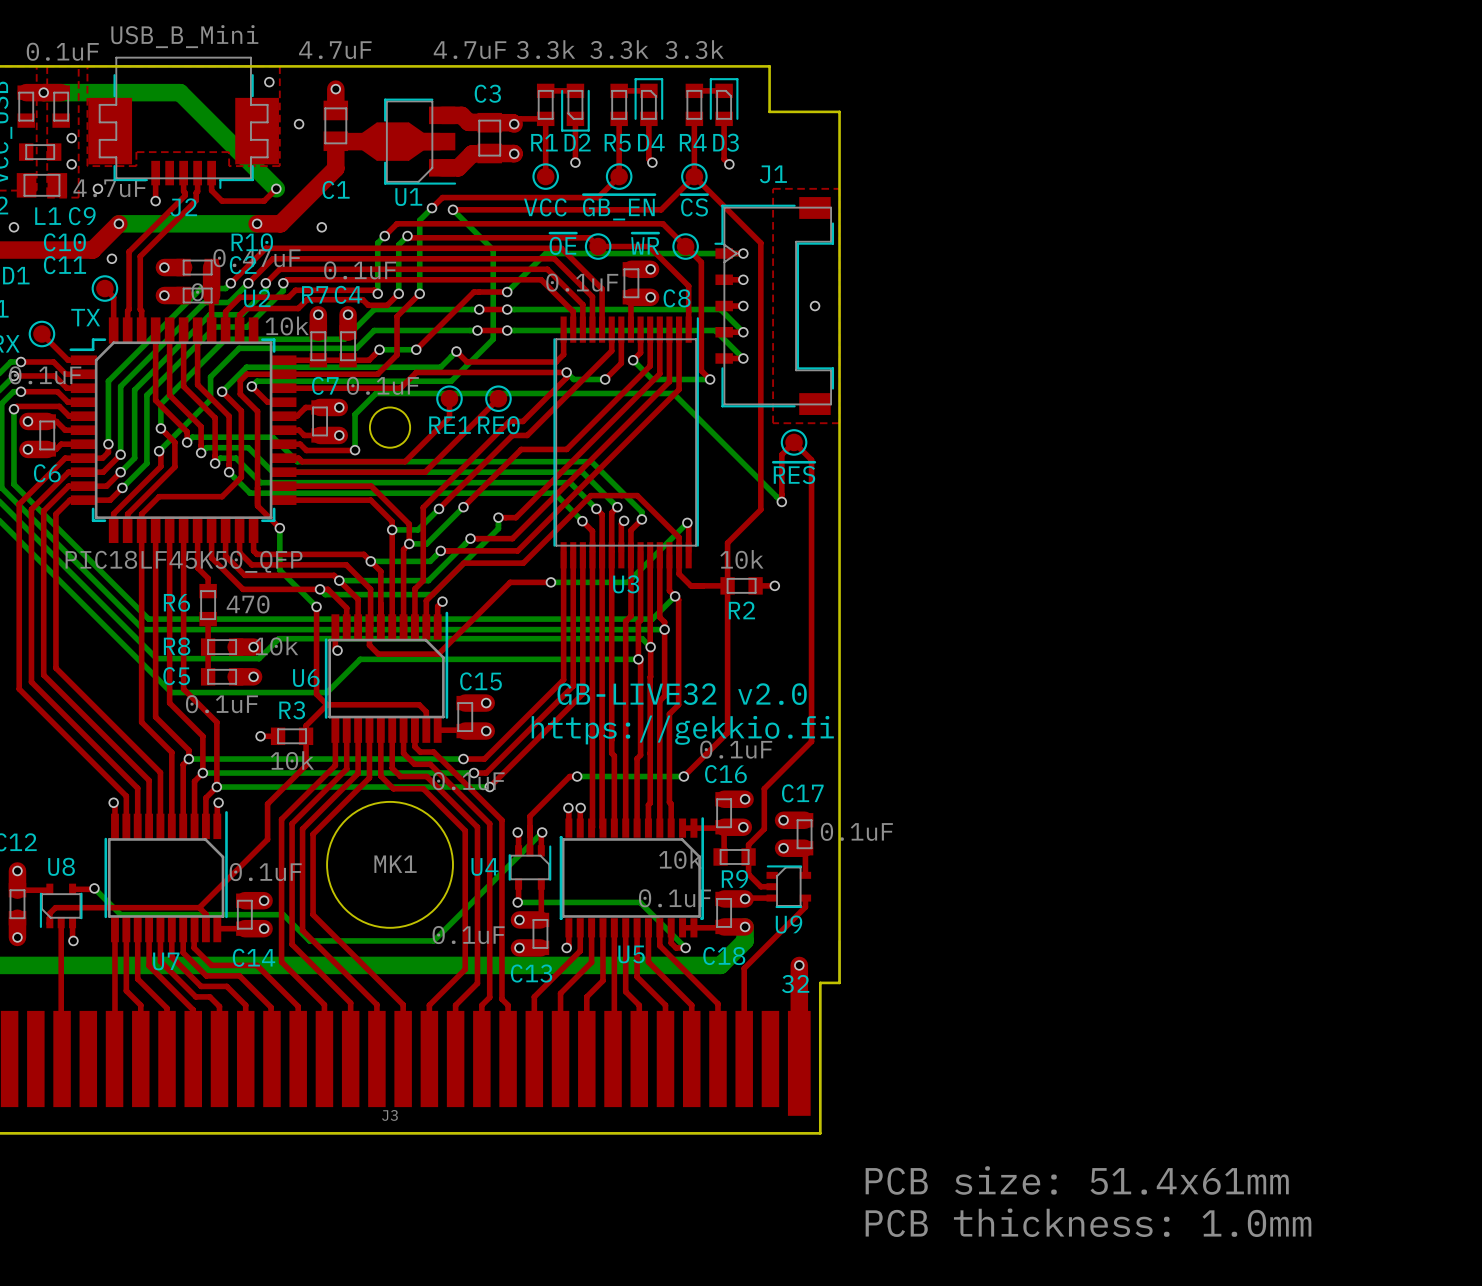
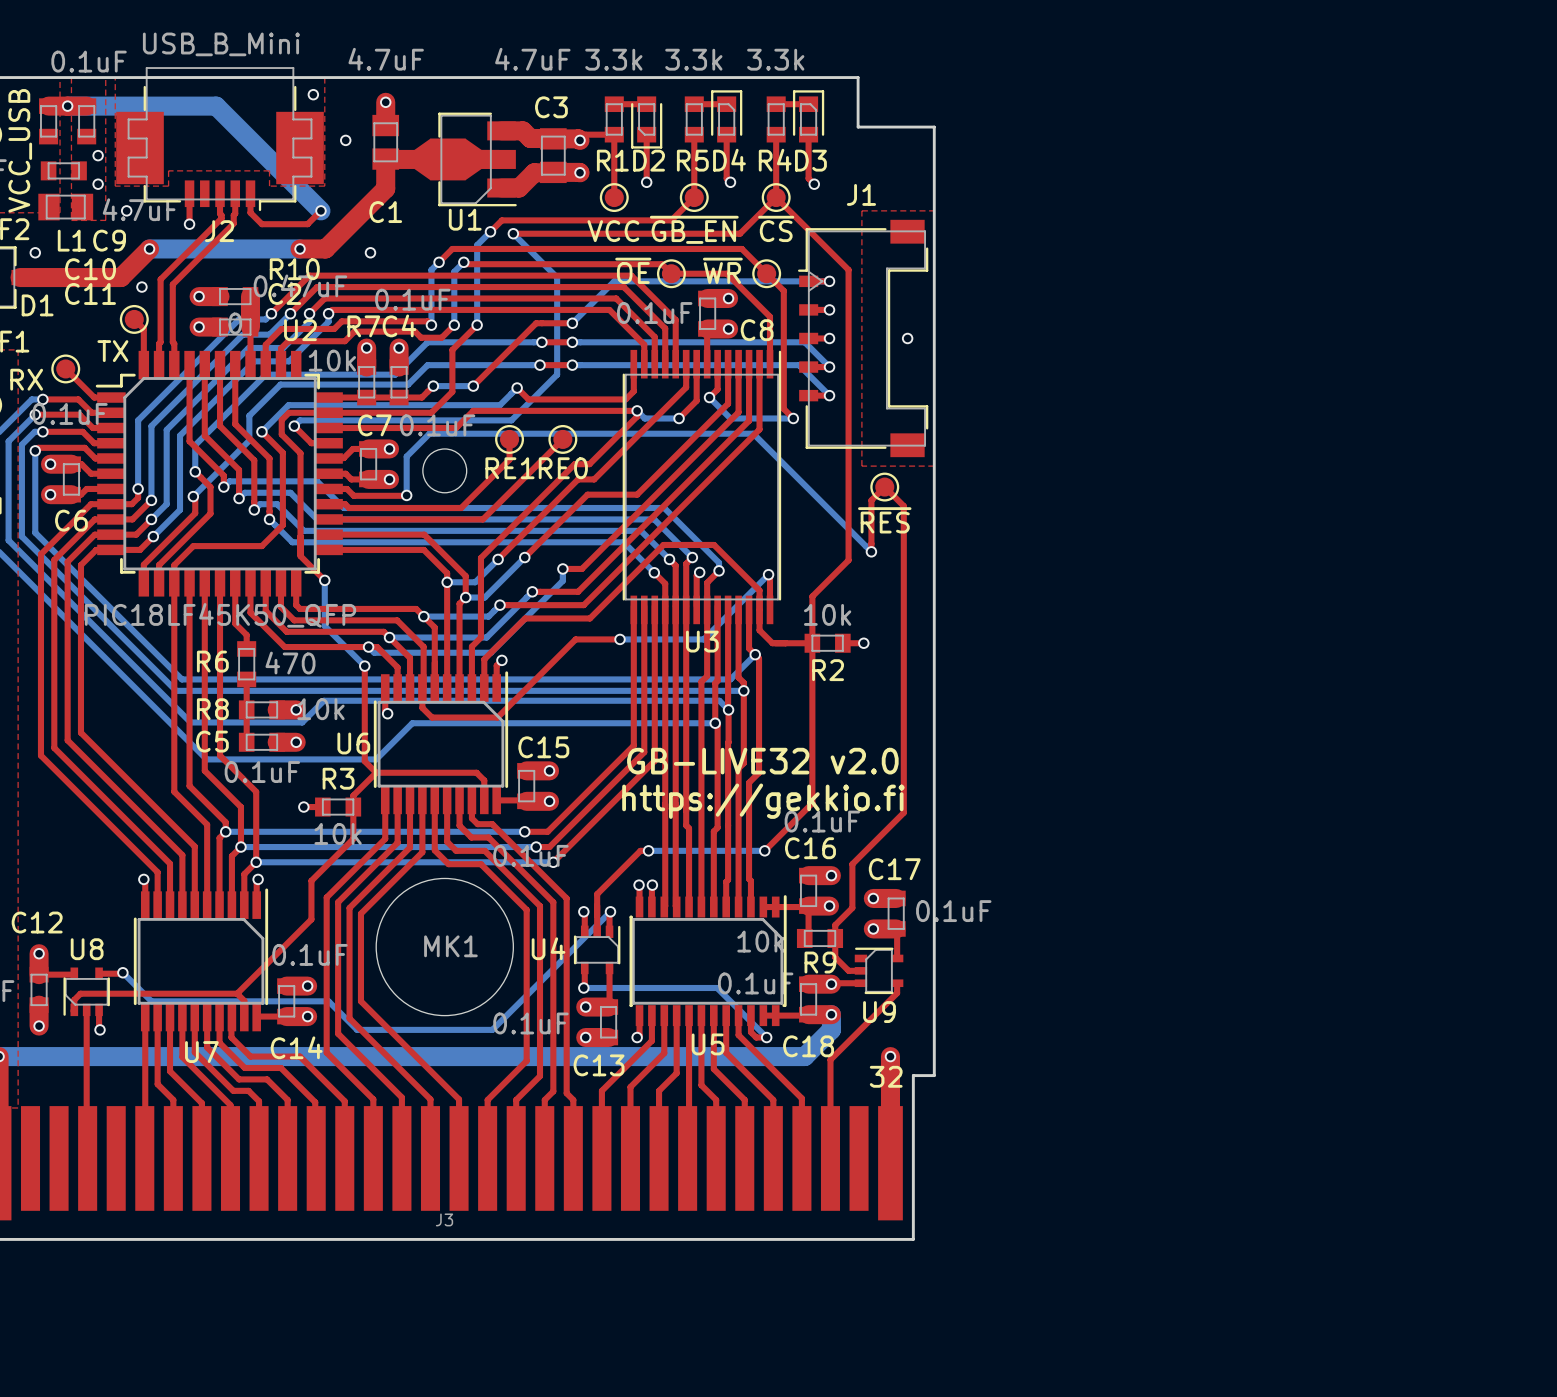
text: PCB size: 51.4x61mm (1077, 1180) -> none
text: PCB thickness: 1.0mm (1088, 1222) -> none

